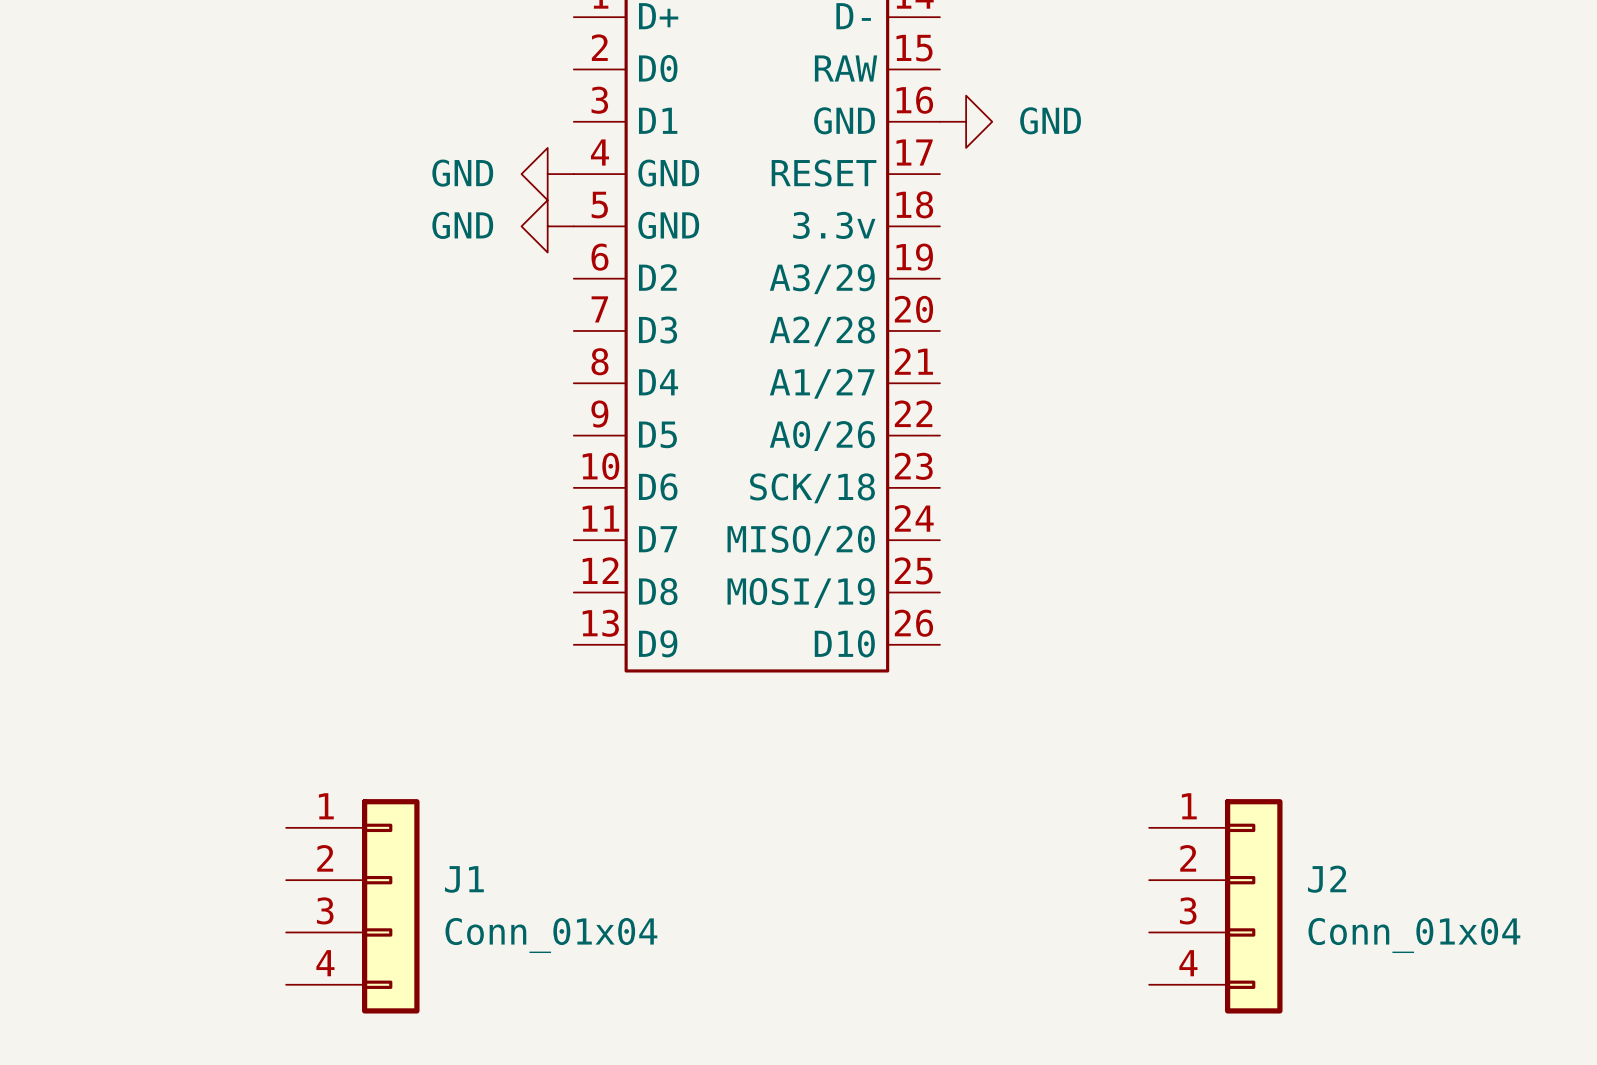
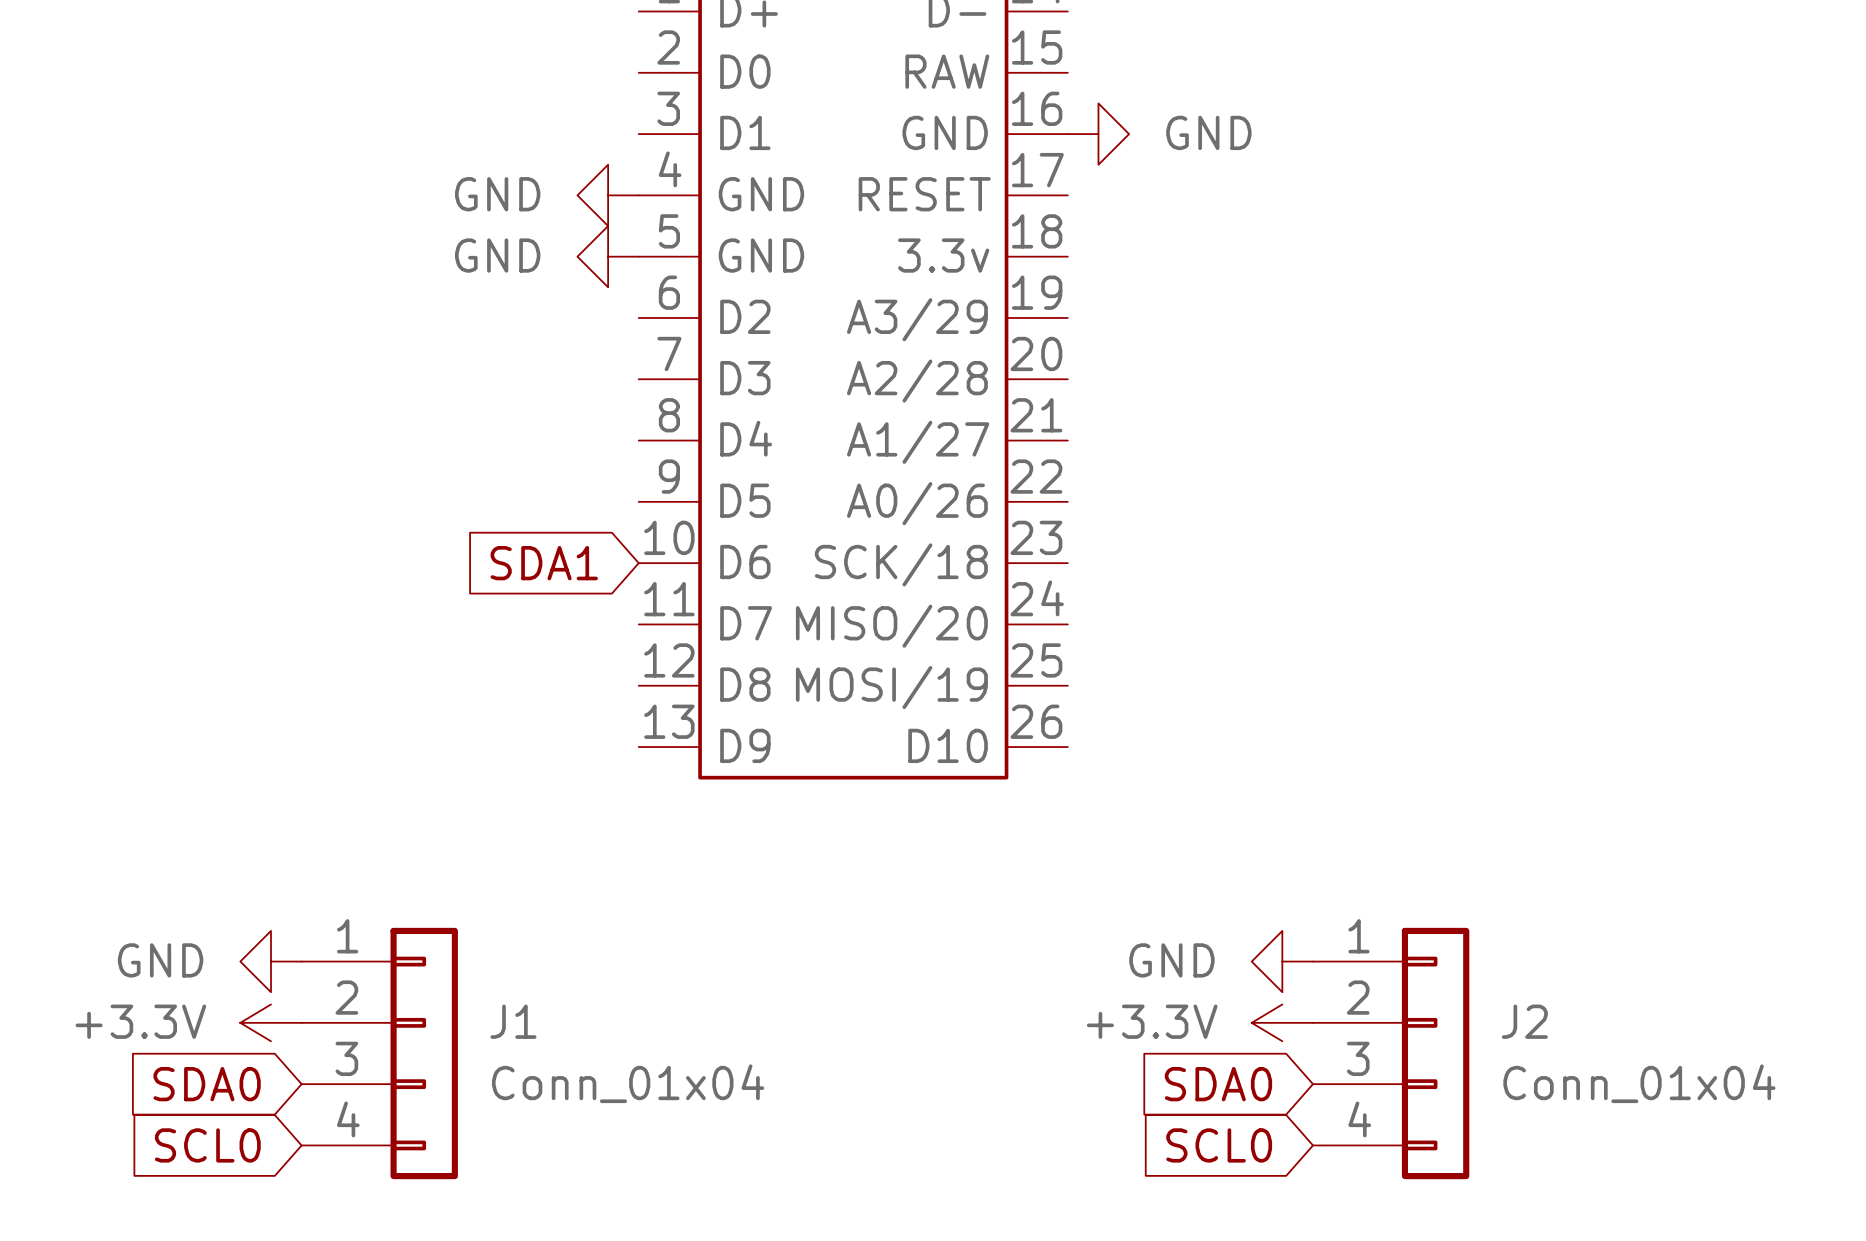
global label: none -> SDA1 (544, 563)
power symbol: none -> GND (270, 961)
power symbol: none -> GND (1282, 961)
power symbol: none -> +3.3V (270, 1022)
power symbol: none -> +3.3V (1282, 1022)
global label: none -> SDA0 (207, 1084)
global label: none -> SDA0 (1218, 1084)
global label: none -> SCL0 (207, 1145)
global label: none -> SCL0 (1219, 1145)

